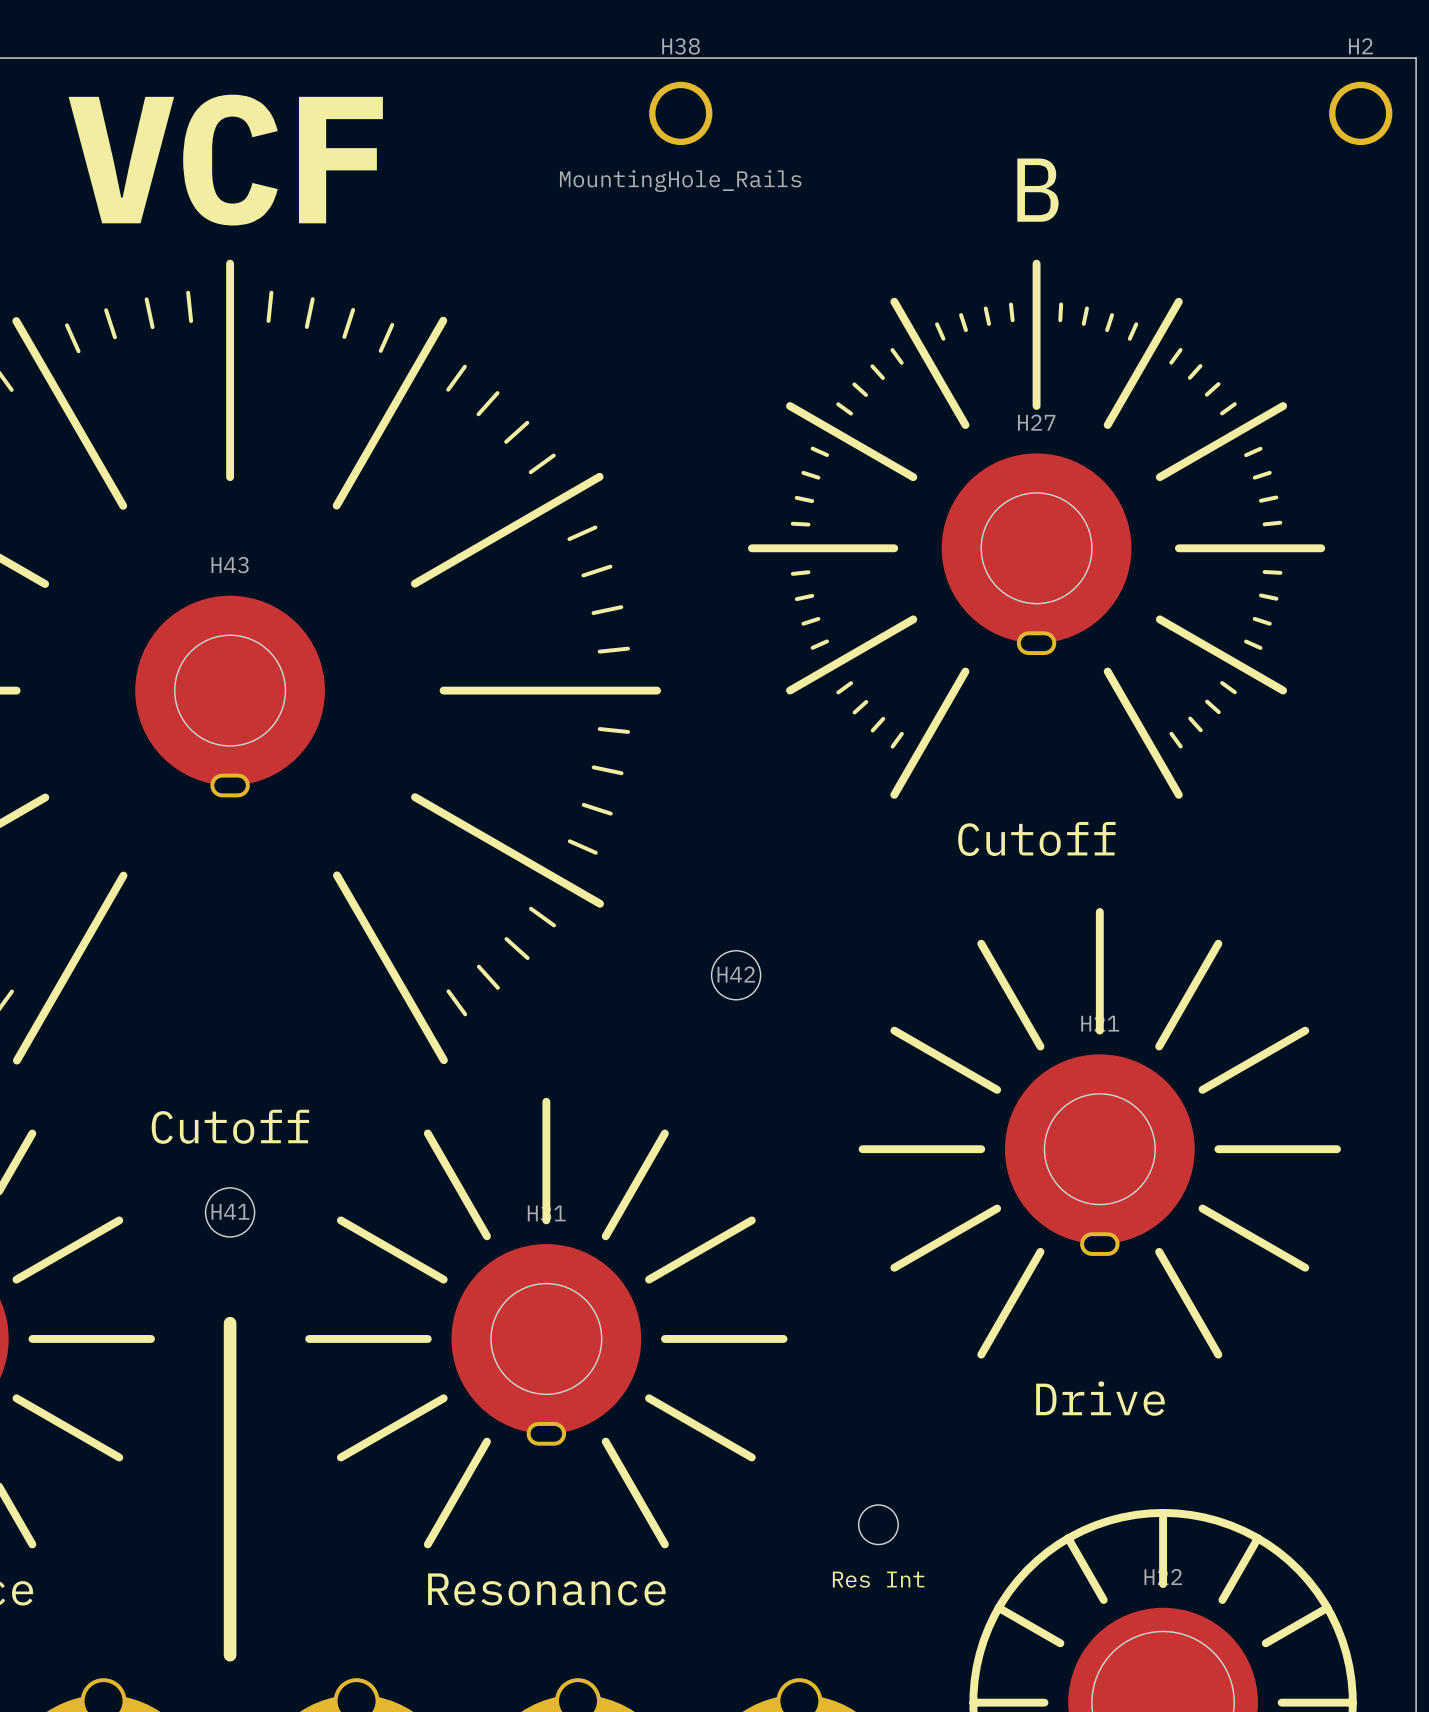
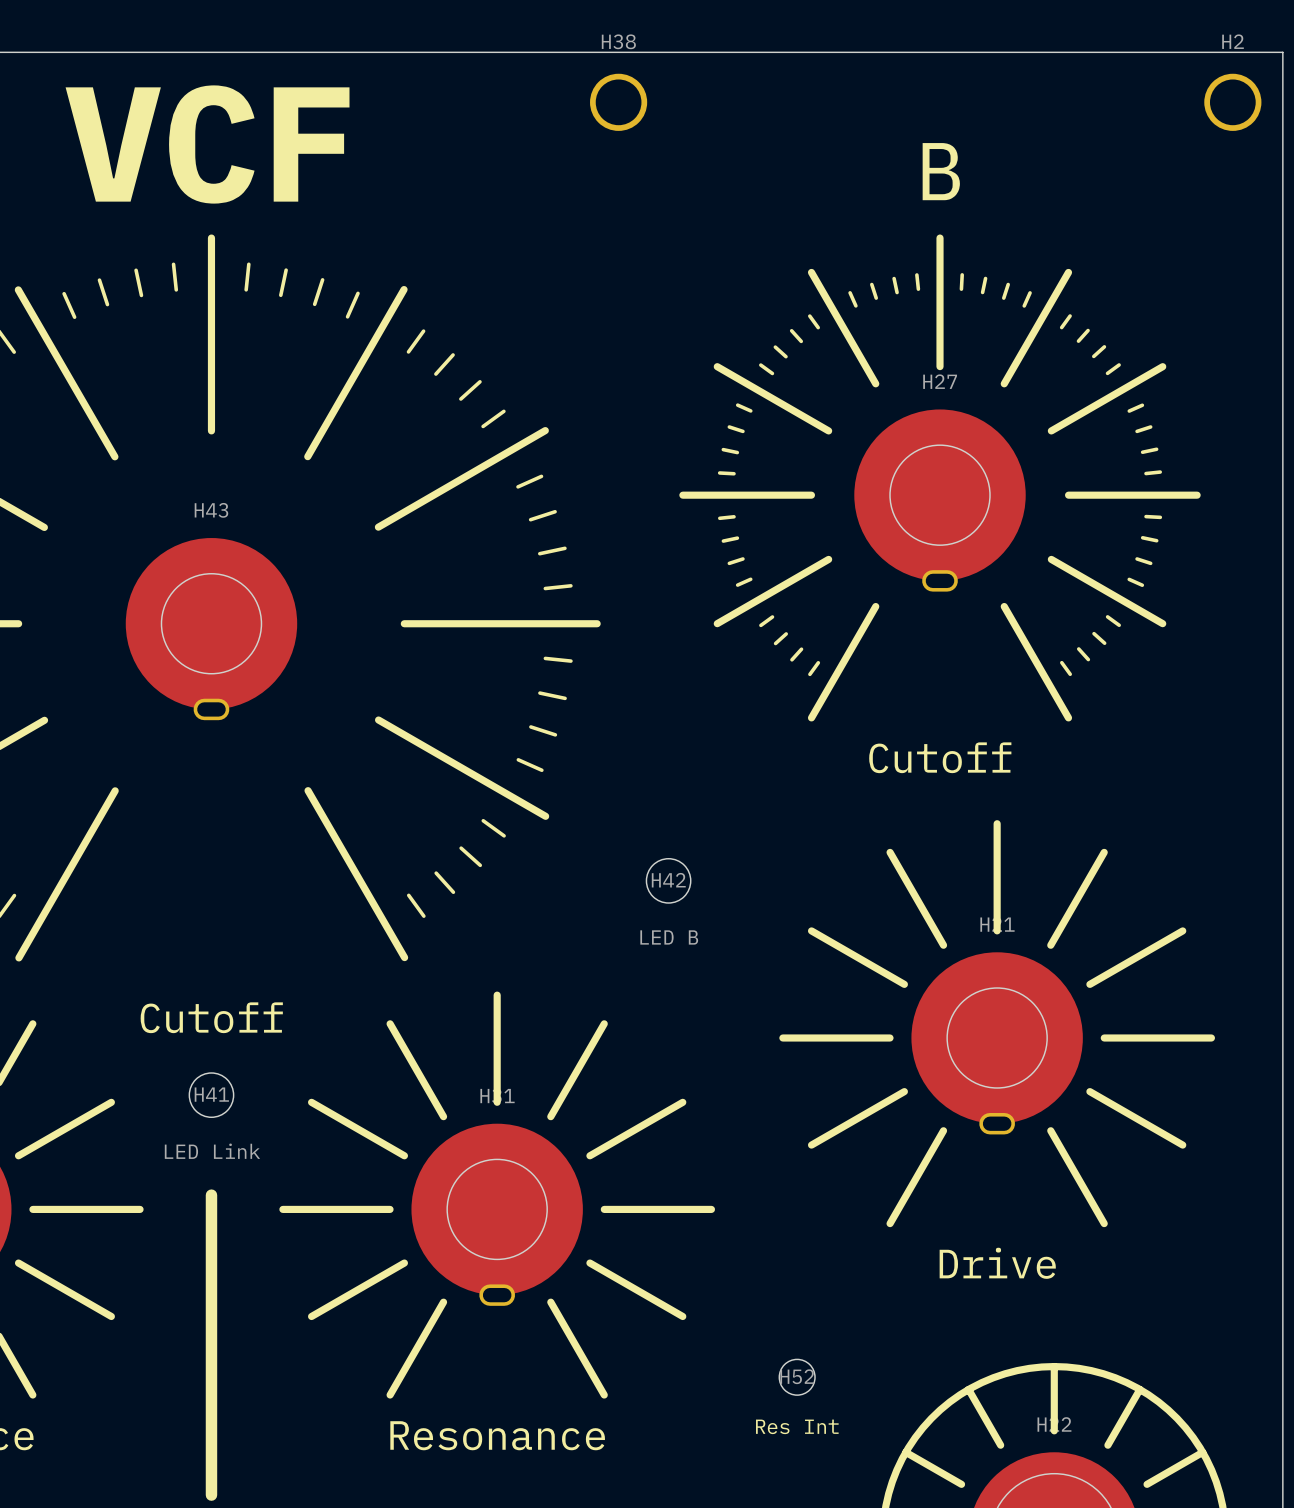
H38 value: MountingHole_Rails (680, 181) -> none
H42 value: none -> LED B (669, 937)
H41 value: none -> LED Link (212, 1151)
H52 name: none -> H52 (797, 1376)

